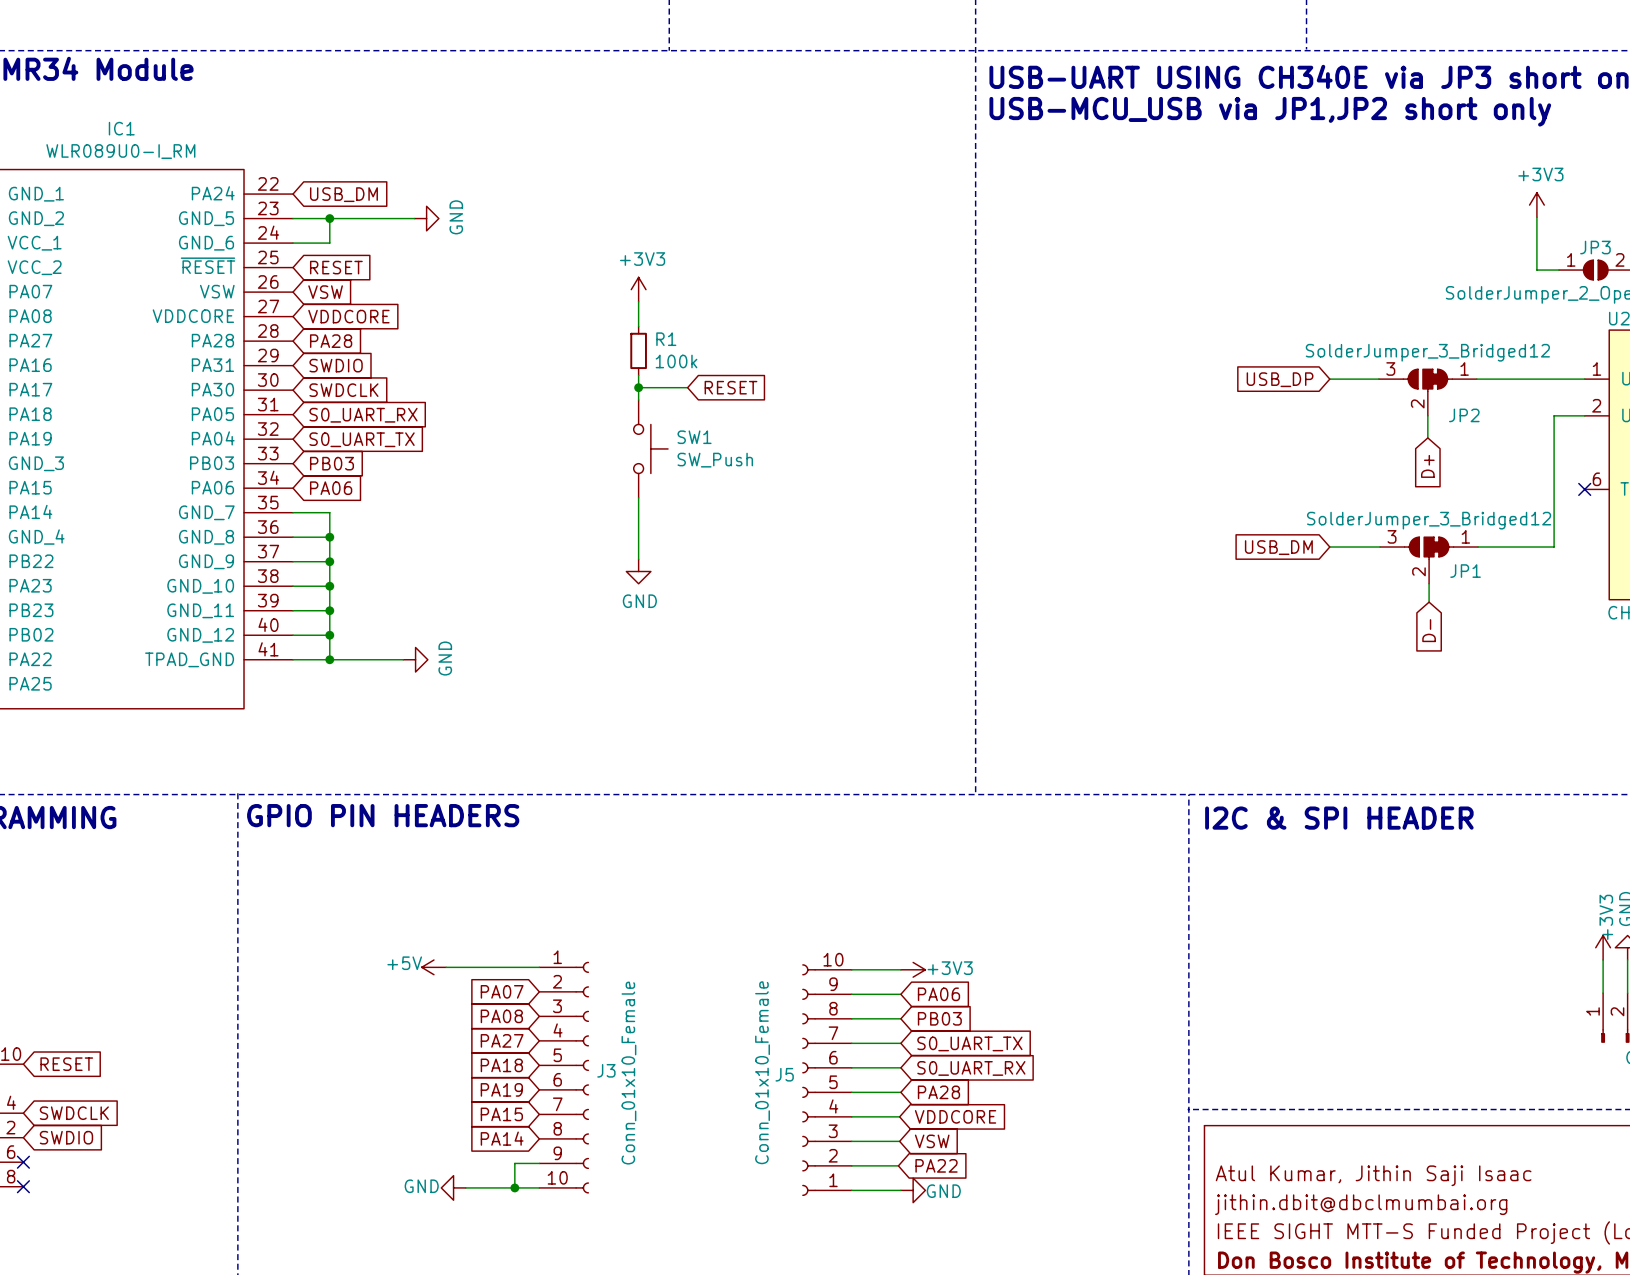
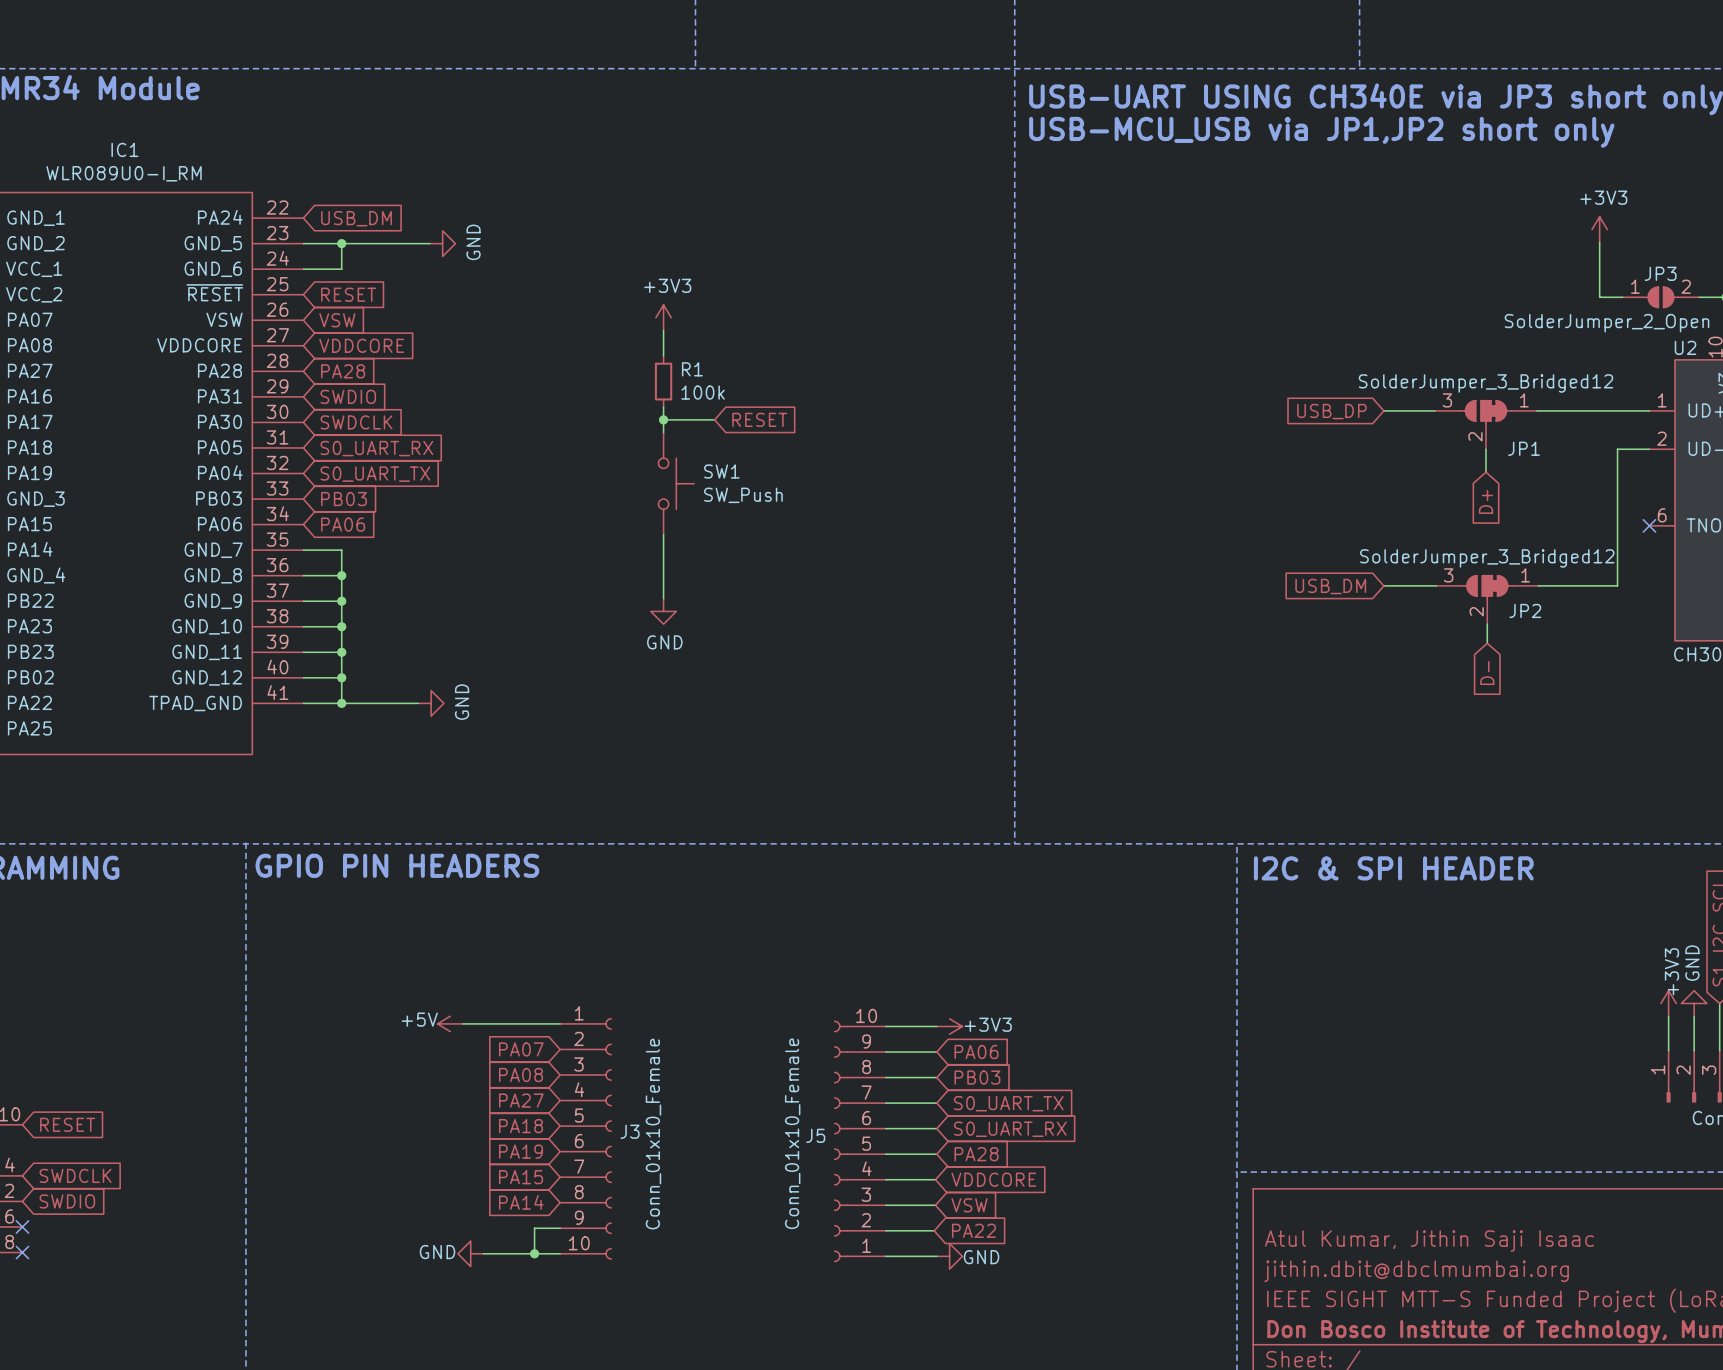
JP2 name: JP2 (1464, 415) -> JP1 (1524, 448)
JP1 name: JP1 (1465, 571) -> JP2 (1525, 610)

